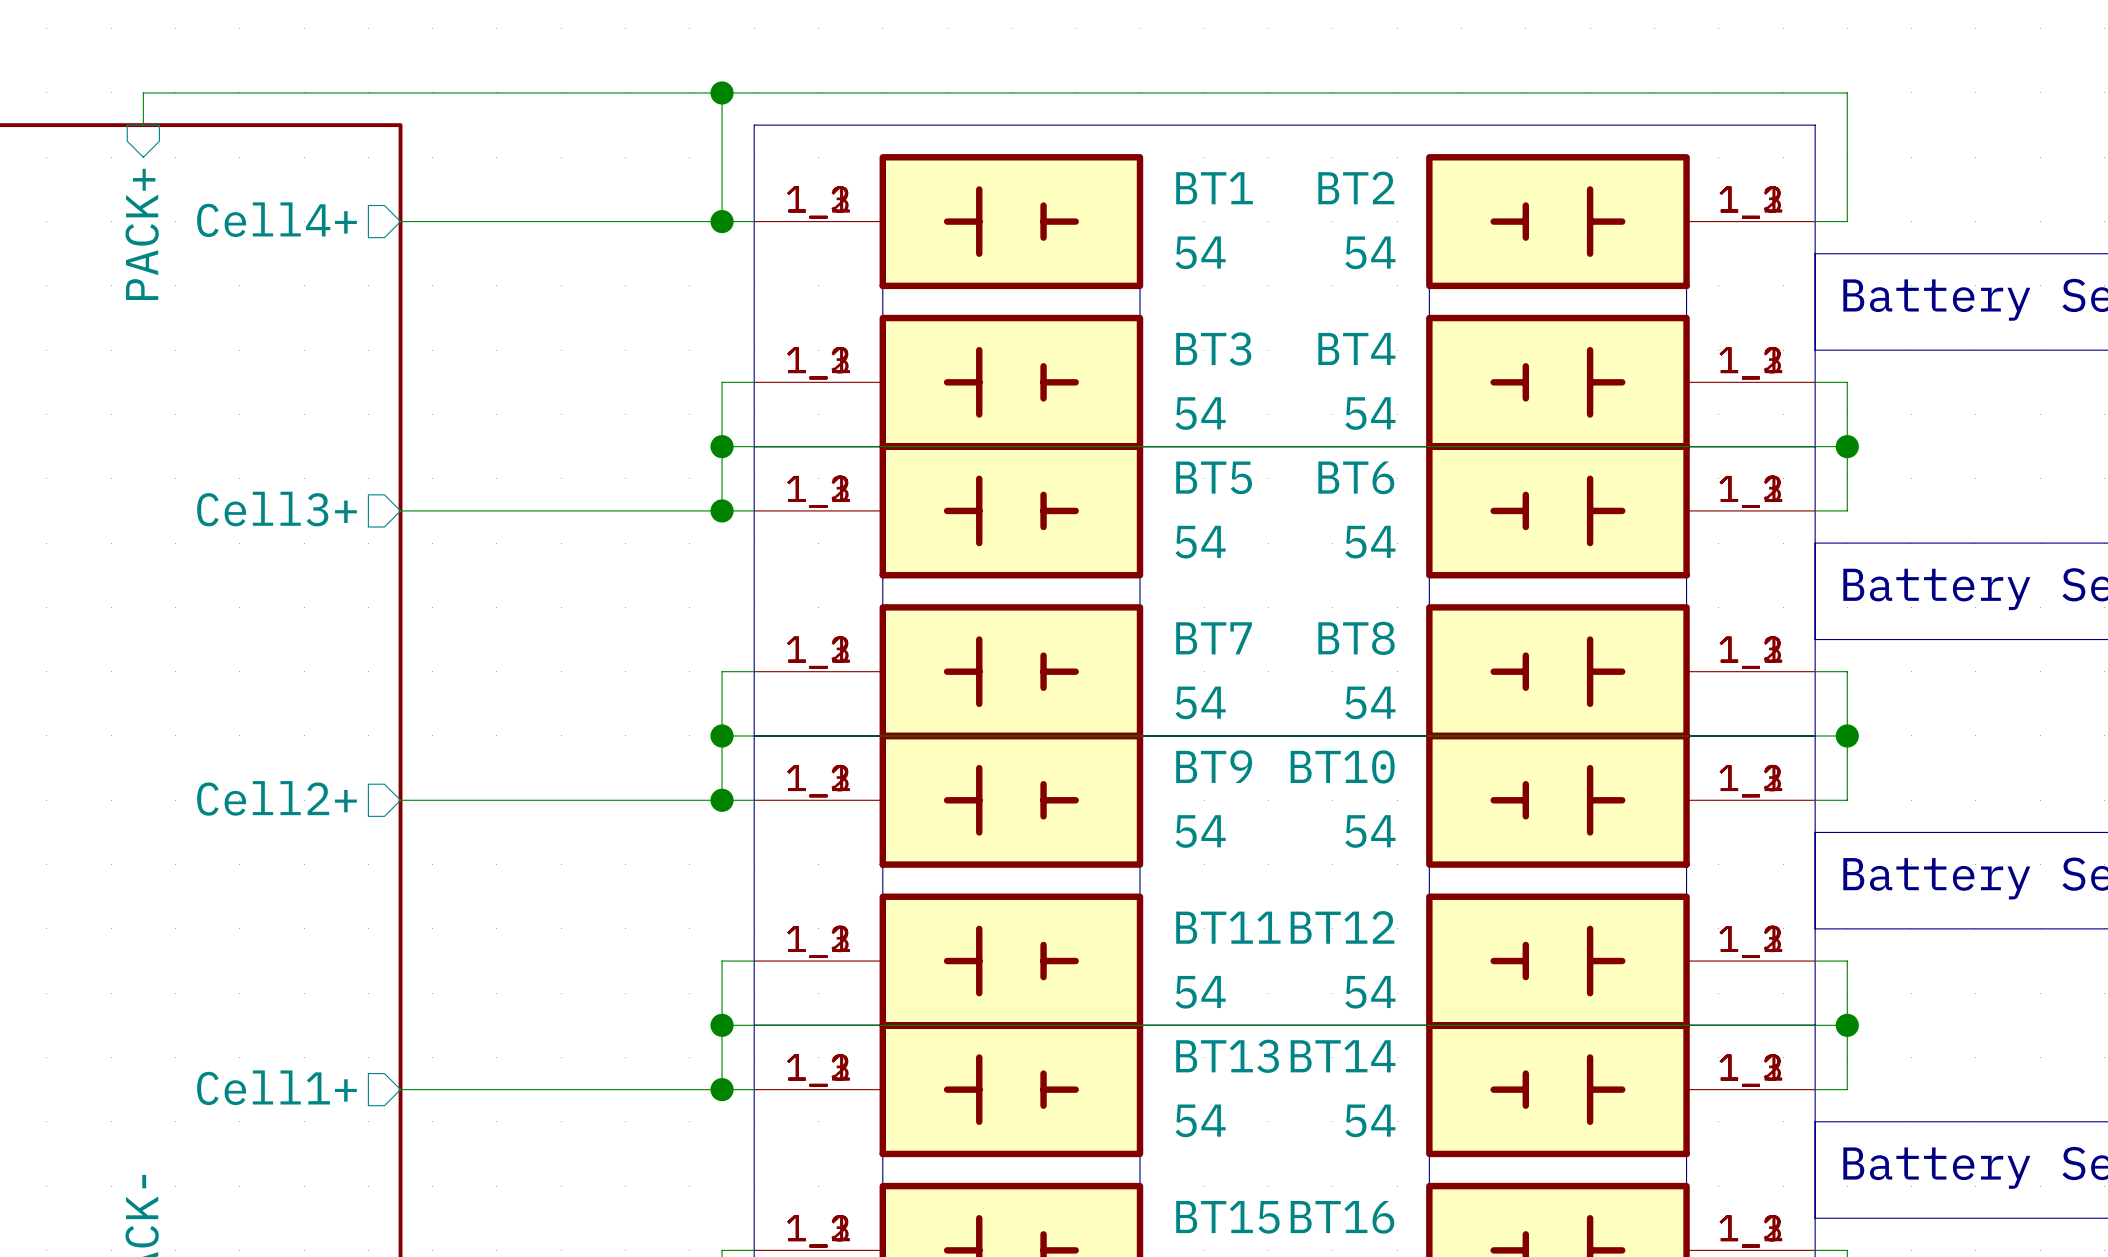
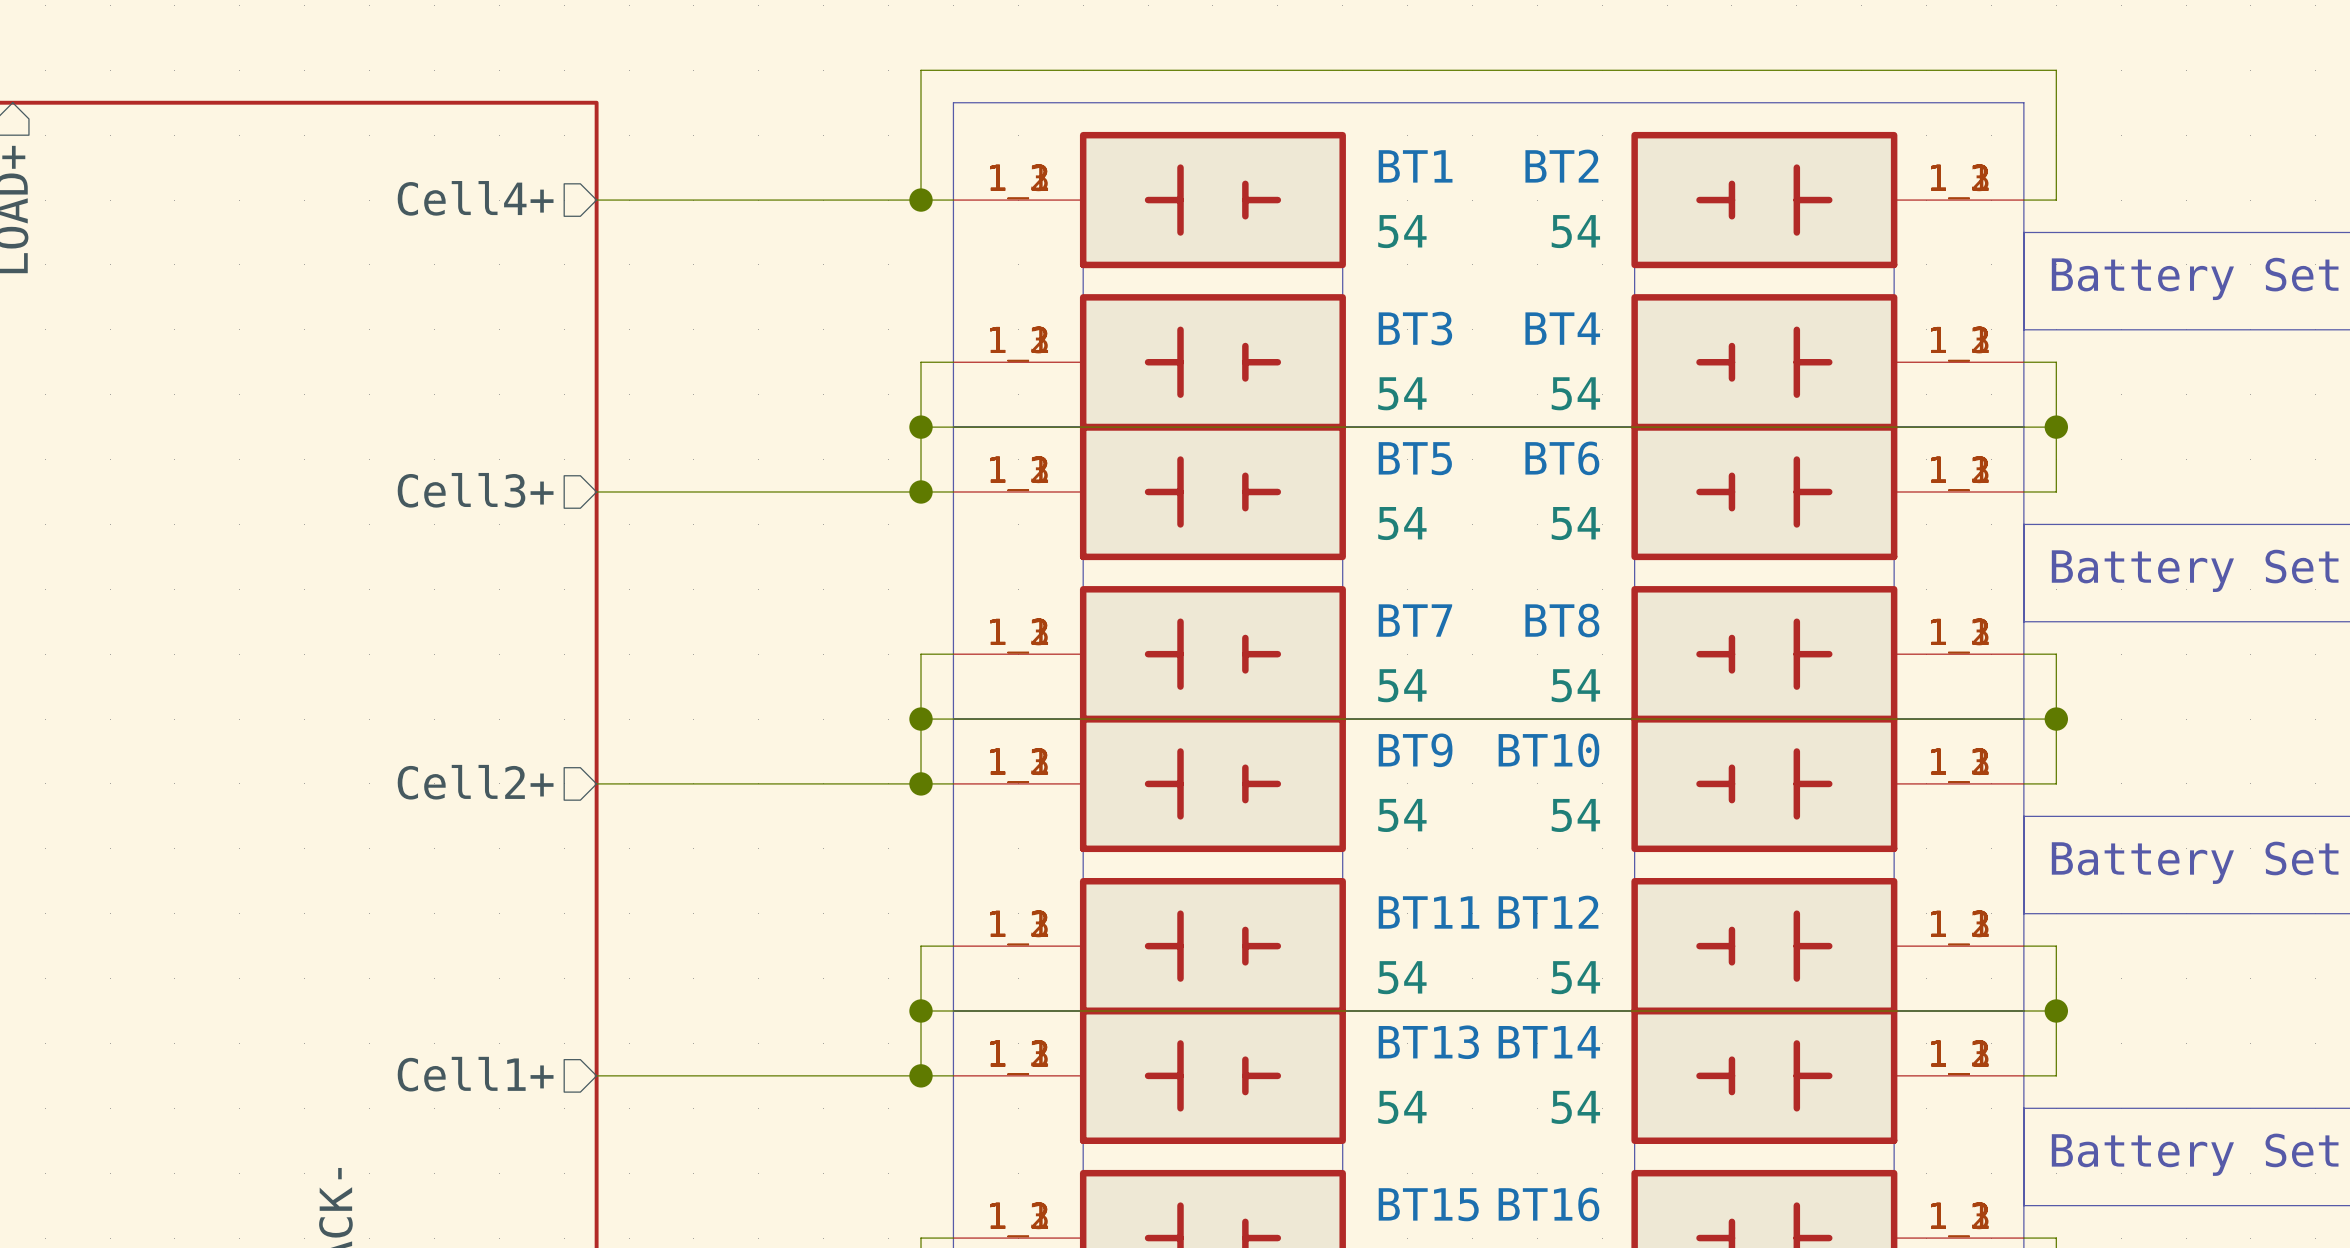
wire: (722, 92) (143, 92) (143, 125) -> none
junction: (722, 92) -> none
sheet pin: PACK+ (142, 234) -> none

